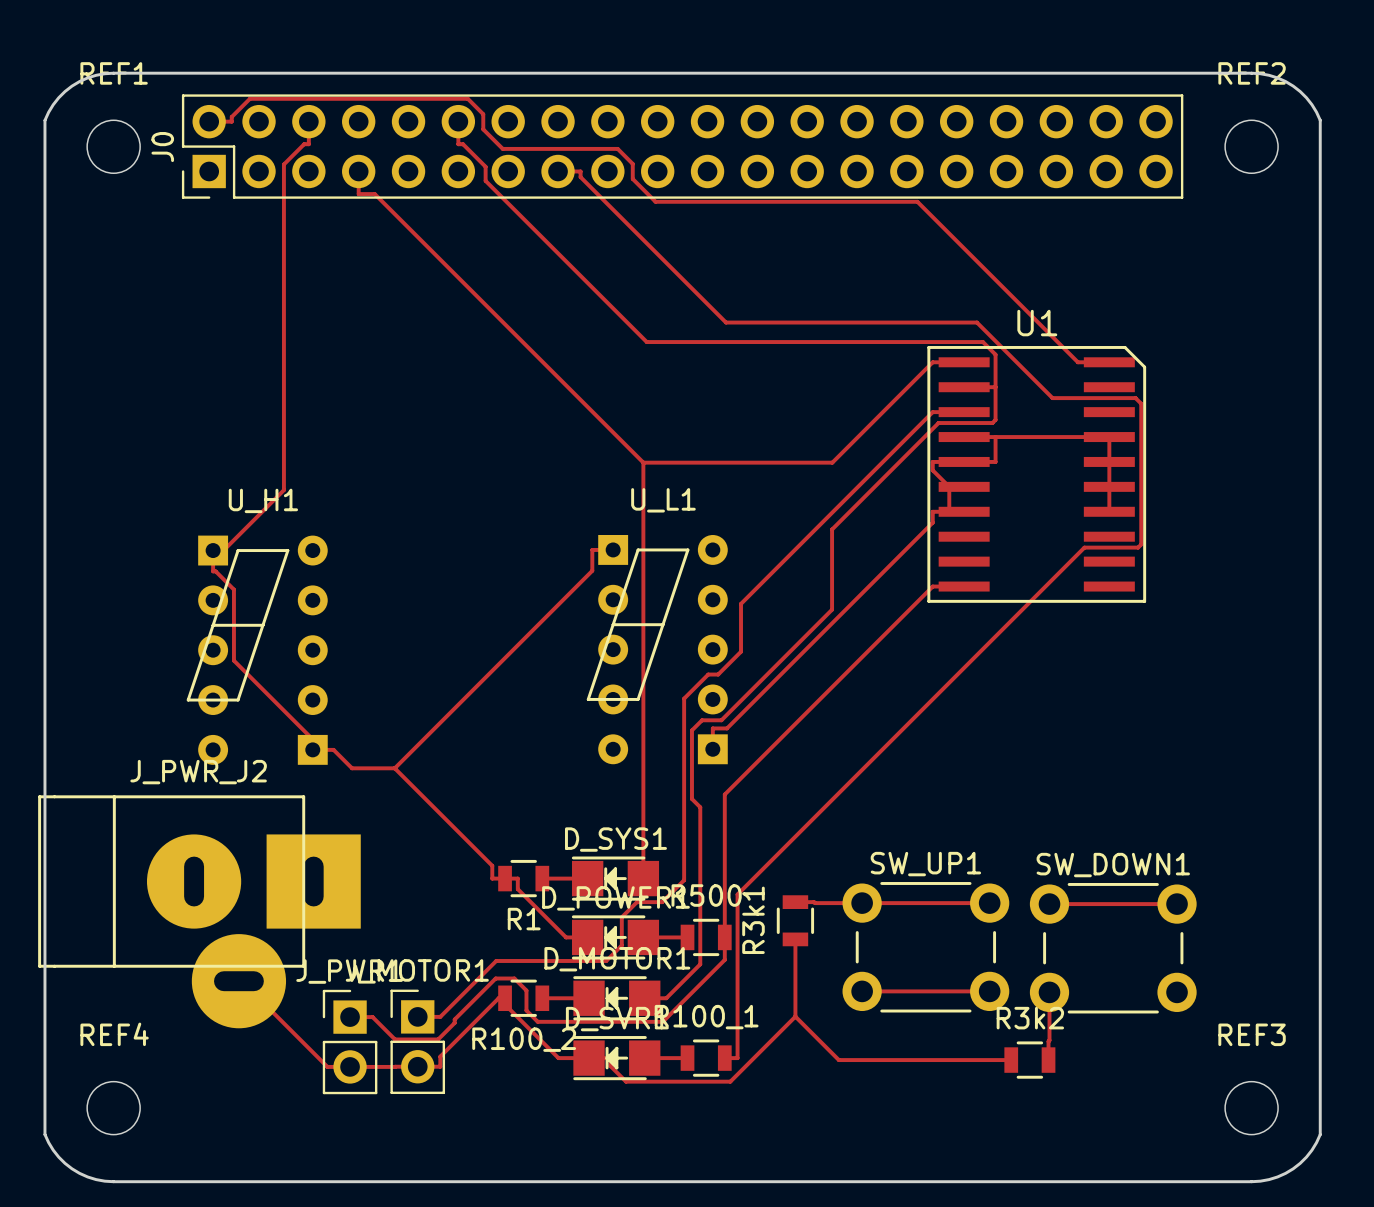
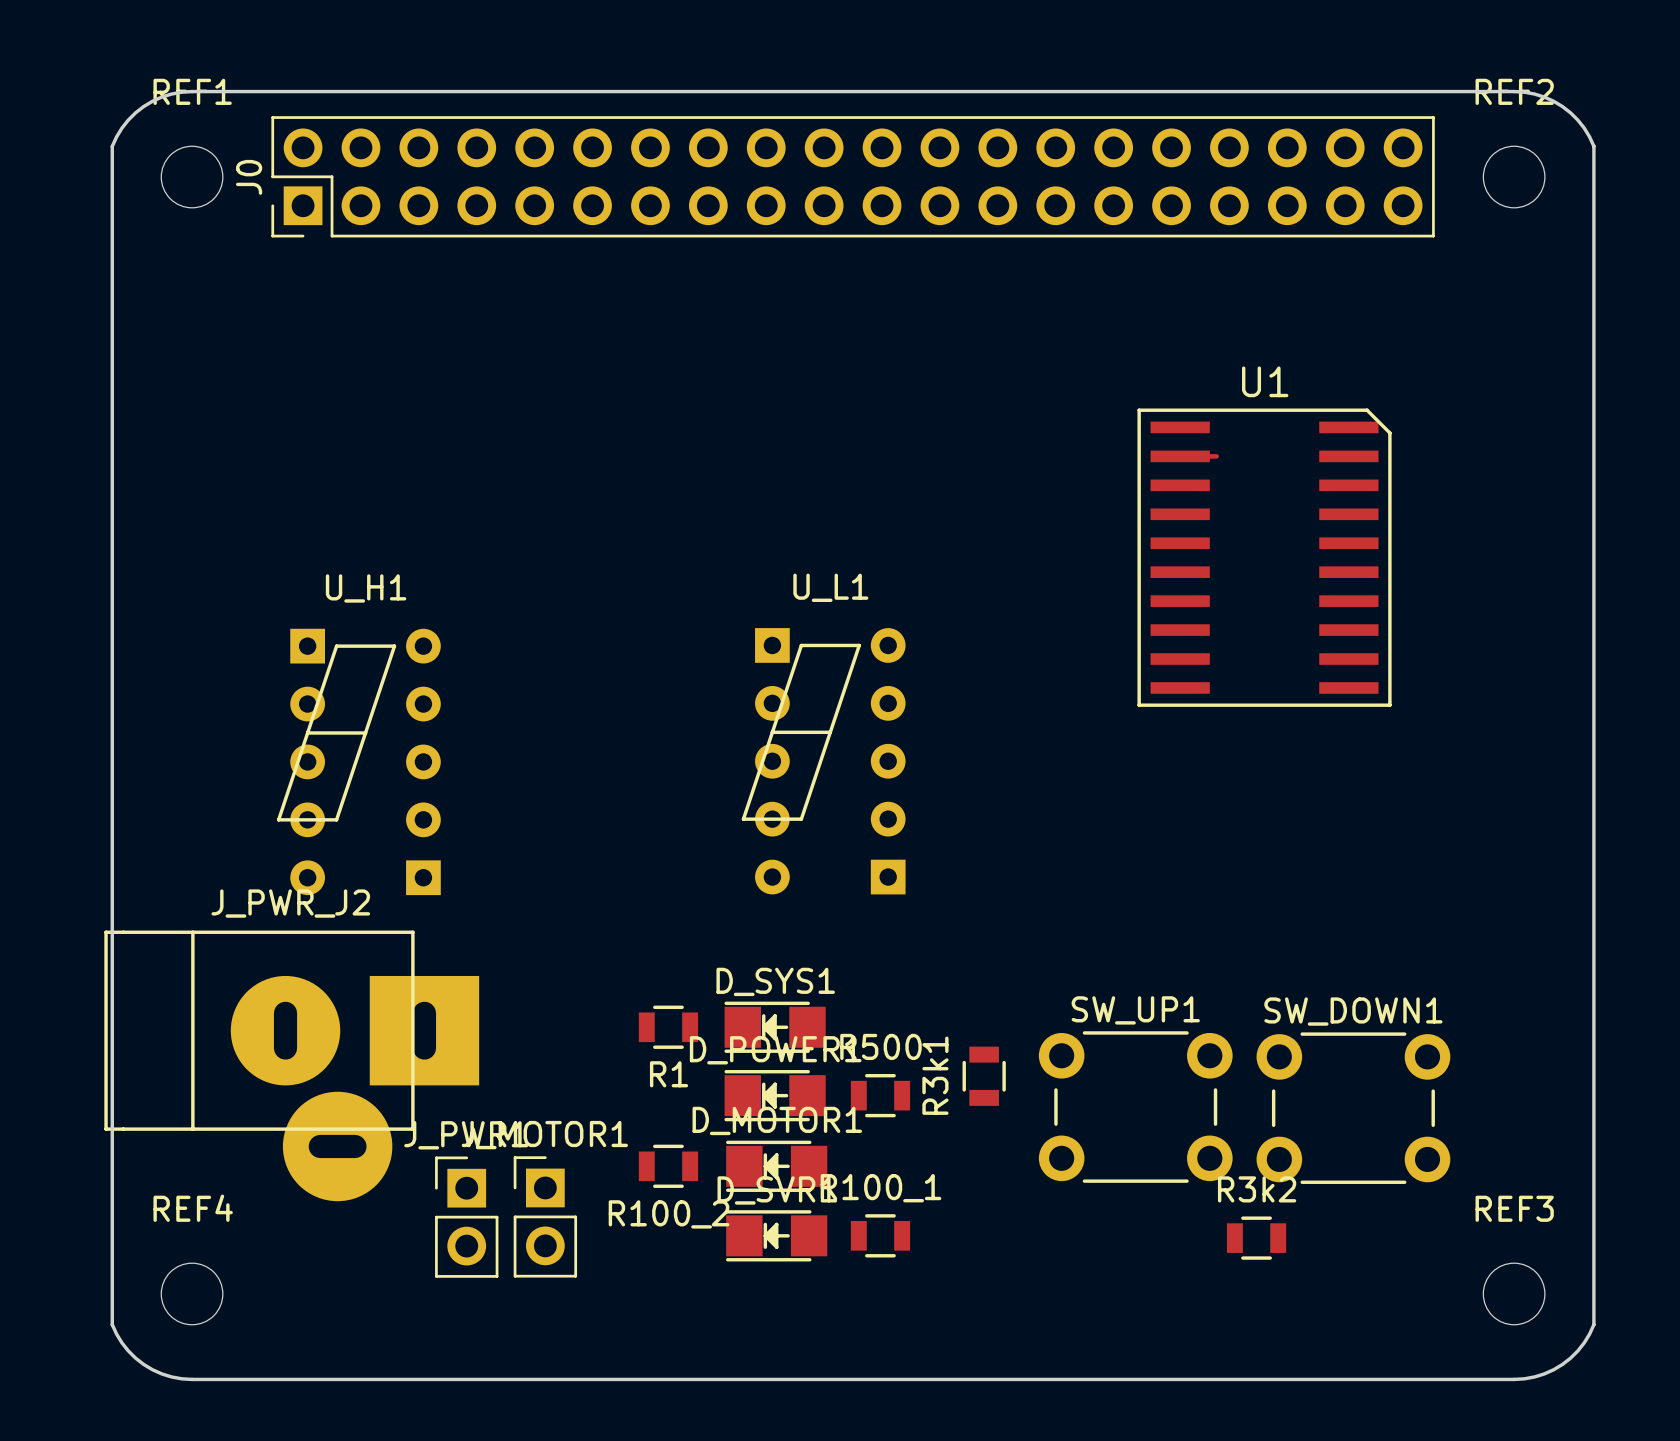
track: (209, 121) (231, 121) (231, 116) (249, 98) (467, 98) (483, 114) (483, 129) (502, 148) (617, 148) (632, 163) (632, 179) (655, 201) (917, 201) (1077, 362) (1109, 362) -> none
track: (308, 121) (308, 144) (304, 144) (283, 164) (283, 490) (213, 560) -> none
track: (458, 121) (458, 144) (463, 144) (485, 166) (485, 180) (646, 342) (982, 342) (995, 354) (995, 419) (992, 423) (938, 423) (832, 529) (832, 609) (721, 720) (702, 720) (691, 730) (691, 799) (700, 807) (700, 964) (666, 998) (644, 998) -> none
track: (358, 171) (358, 194) (374, 194) (643, 462) -> none
track: (558, 171) (580, 171) (580, 177) (726, 322) (976, 322) (1052, 398) (1135, 398) (1141, 403) (1141, 544) (1138, 547) (1084, 547) (737, 894) (737, 1058) (724, 1058) -> none
track: (964, 362) (932, 362) (832, 462) (643, 462) -> none
track: (964, 412) (932, 412) (741, 603) (741, 651) (718, 674) (708, 674) (684, 698) (684, 880) (662, 902) (636, 902) (621, 917) (621, 945) (606, 961) (496, 961) (440, 1016) (417, 1016) -> none
track: (964, 437) (1109, 437) (1109, 511) -> none
track: (995, 437) (995, 461) (932, 461) (932, 470) (949, 486) -> none
track: (643, 462) (643, 878) -> none
track: (949, 486) (948, 511) -> none
track: (964, 511) (932, 511) (932, 522) (727, 728) (712, 728) (712, 749) -> none
track: (613, 549) (592, 549) (592, 570) (394, 768) -> none
track: (213, 550) (213, 571) (215, 571) (233, 589) (233, 660) (323, 749) -> none
track: (964, 586) (932, 586) (724, 794) (724, 959) (662, 1021) (537, 1021) (526, 1010) (526, 990) (514, 978) (495, 978) (454, 1019) (454, 1022) (438, 1039) (395, 1039) (372, 1017) (350, 1017) -> none
track: (312, 749) (333, 749) (352, 768) (394, 768) -> none
track: (394, 768) (492, 865) (492, 878) (517, 878) (517, 889) (566, 937) (587, 937) -> none
track: (542, 878) (587, 878) -> none
track: (795, 902) (989, 903) -> none
track: (1049, 904) (1177, 904) -> none
track: (643, 937) (687, 937) -> none
track: (795, 939) (795, 1016) -> none
track: (238, 981) (241, 981) (327, 1066) (394, 1066) -> none
track: (862, 991) (989, 991) -> none
track: (1049, 992) (1048, 1060) -> none
track: (498, 998) (558, 1058) (610, 1058) (610, 1066) (626, 1081) (730, 1081) (795, 1016) -> none
track: (498, 998) (440, 1056) (440, 1066) (395, 1066) -> none
track: (542, 998) (589, 998) -> none
track: (795, 1016) (838, 1060) (1011, 1060) -> none
track: (644, 1058) (687, 1058) -> none

